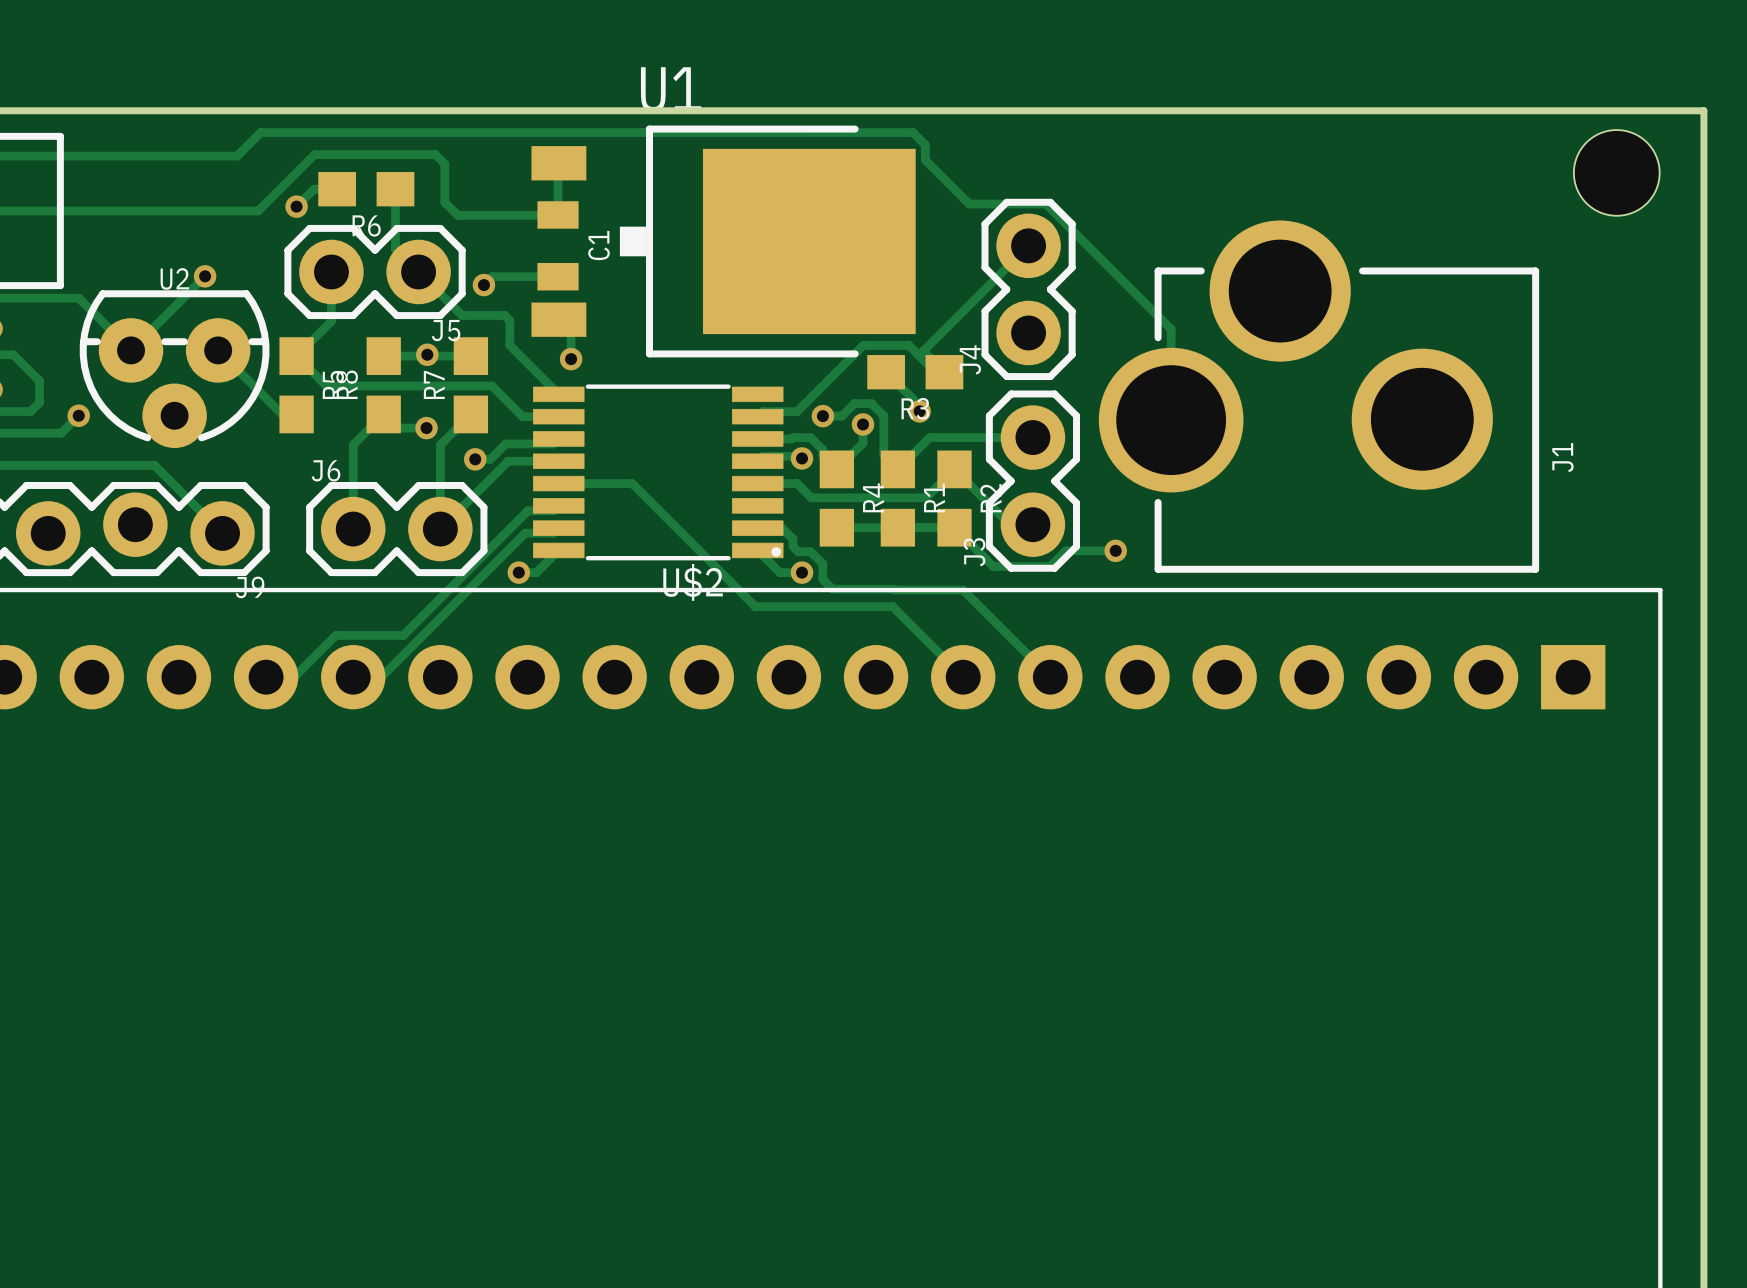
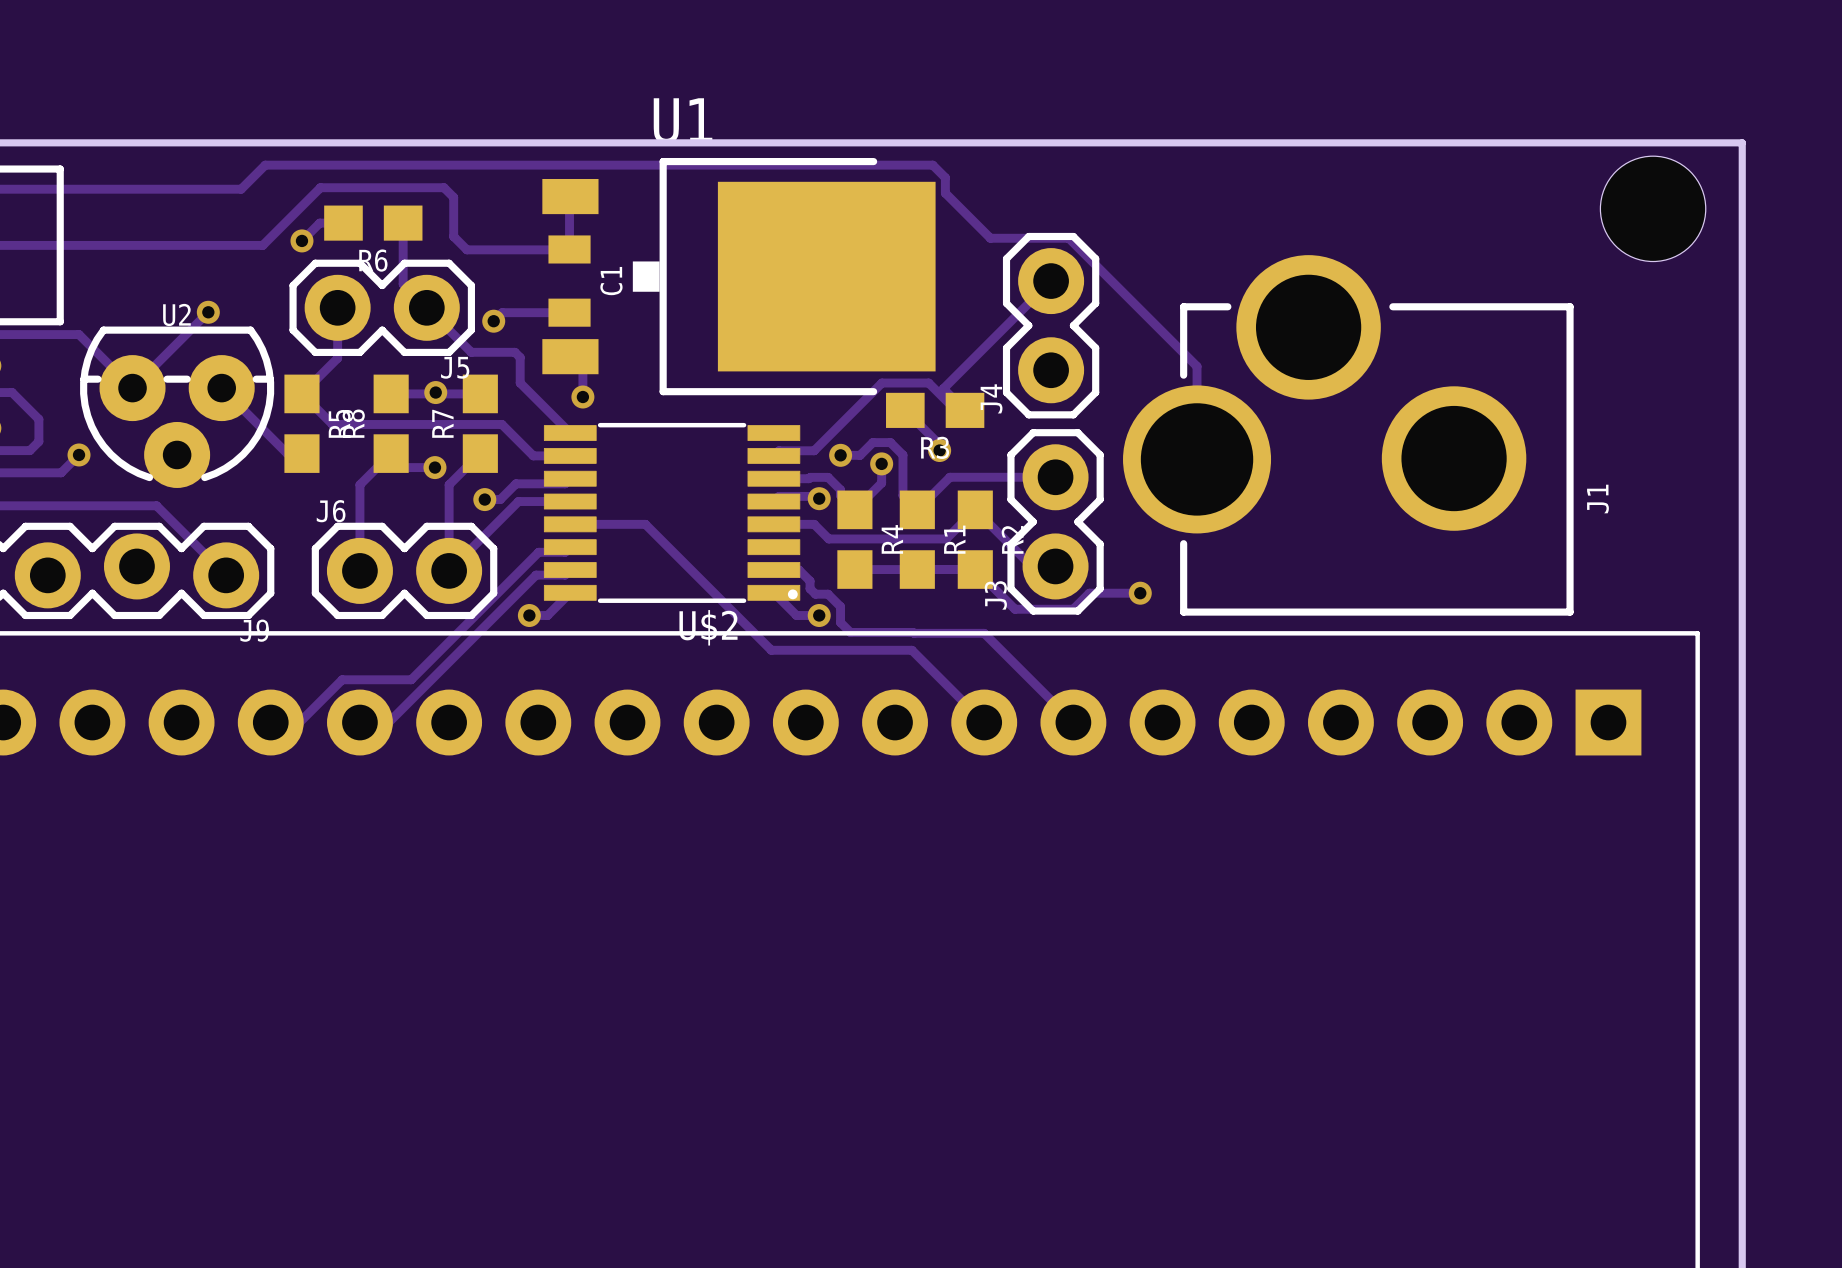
hole size: [1573, 130, 1660, 216] -> [1600, 156, 1706, 262]

